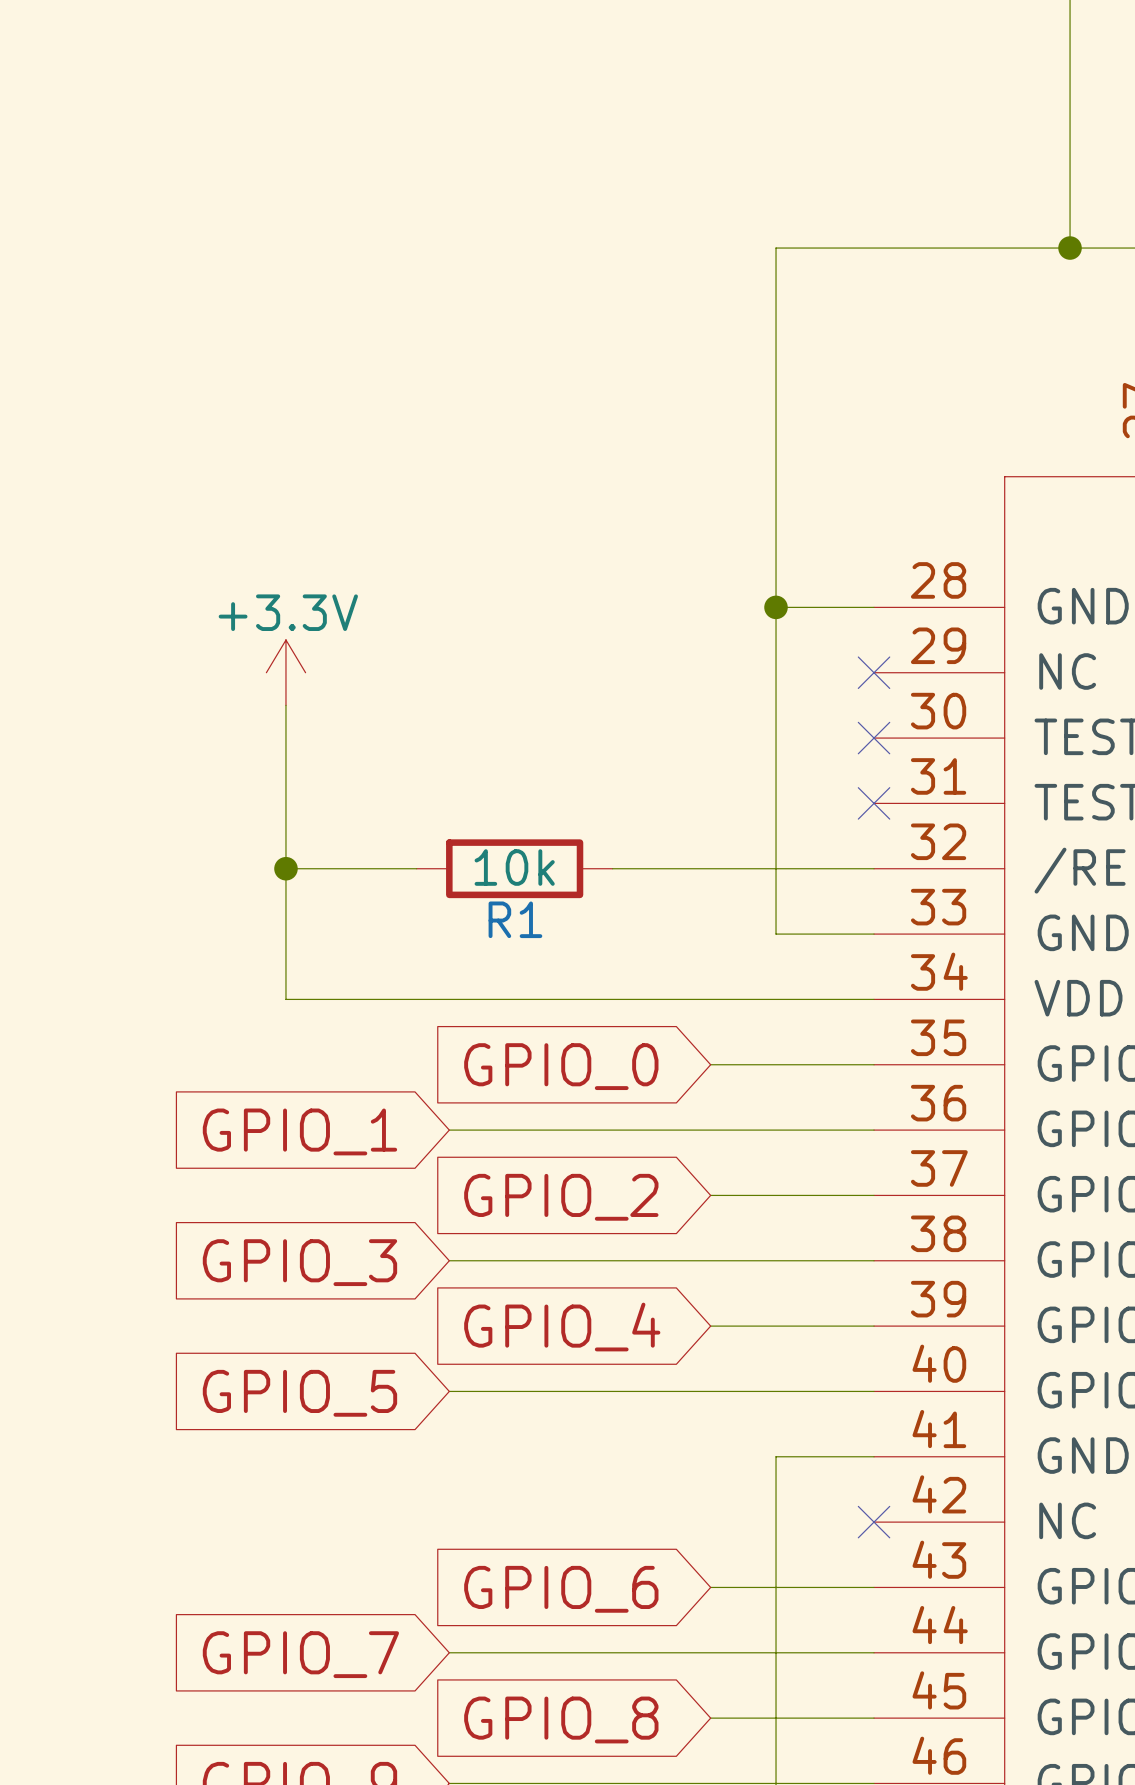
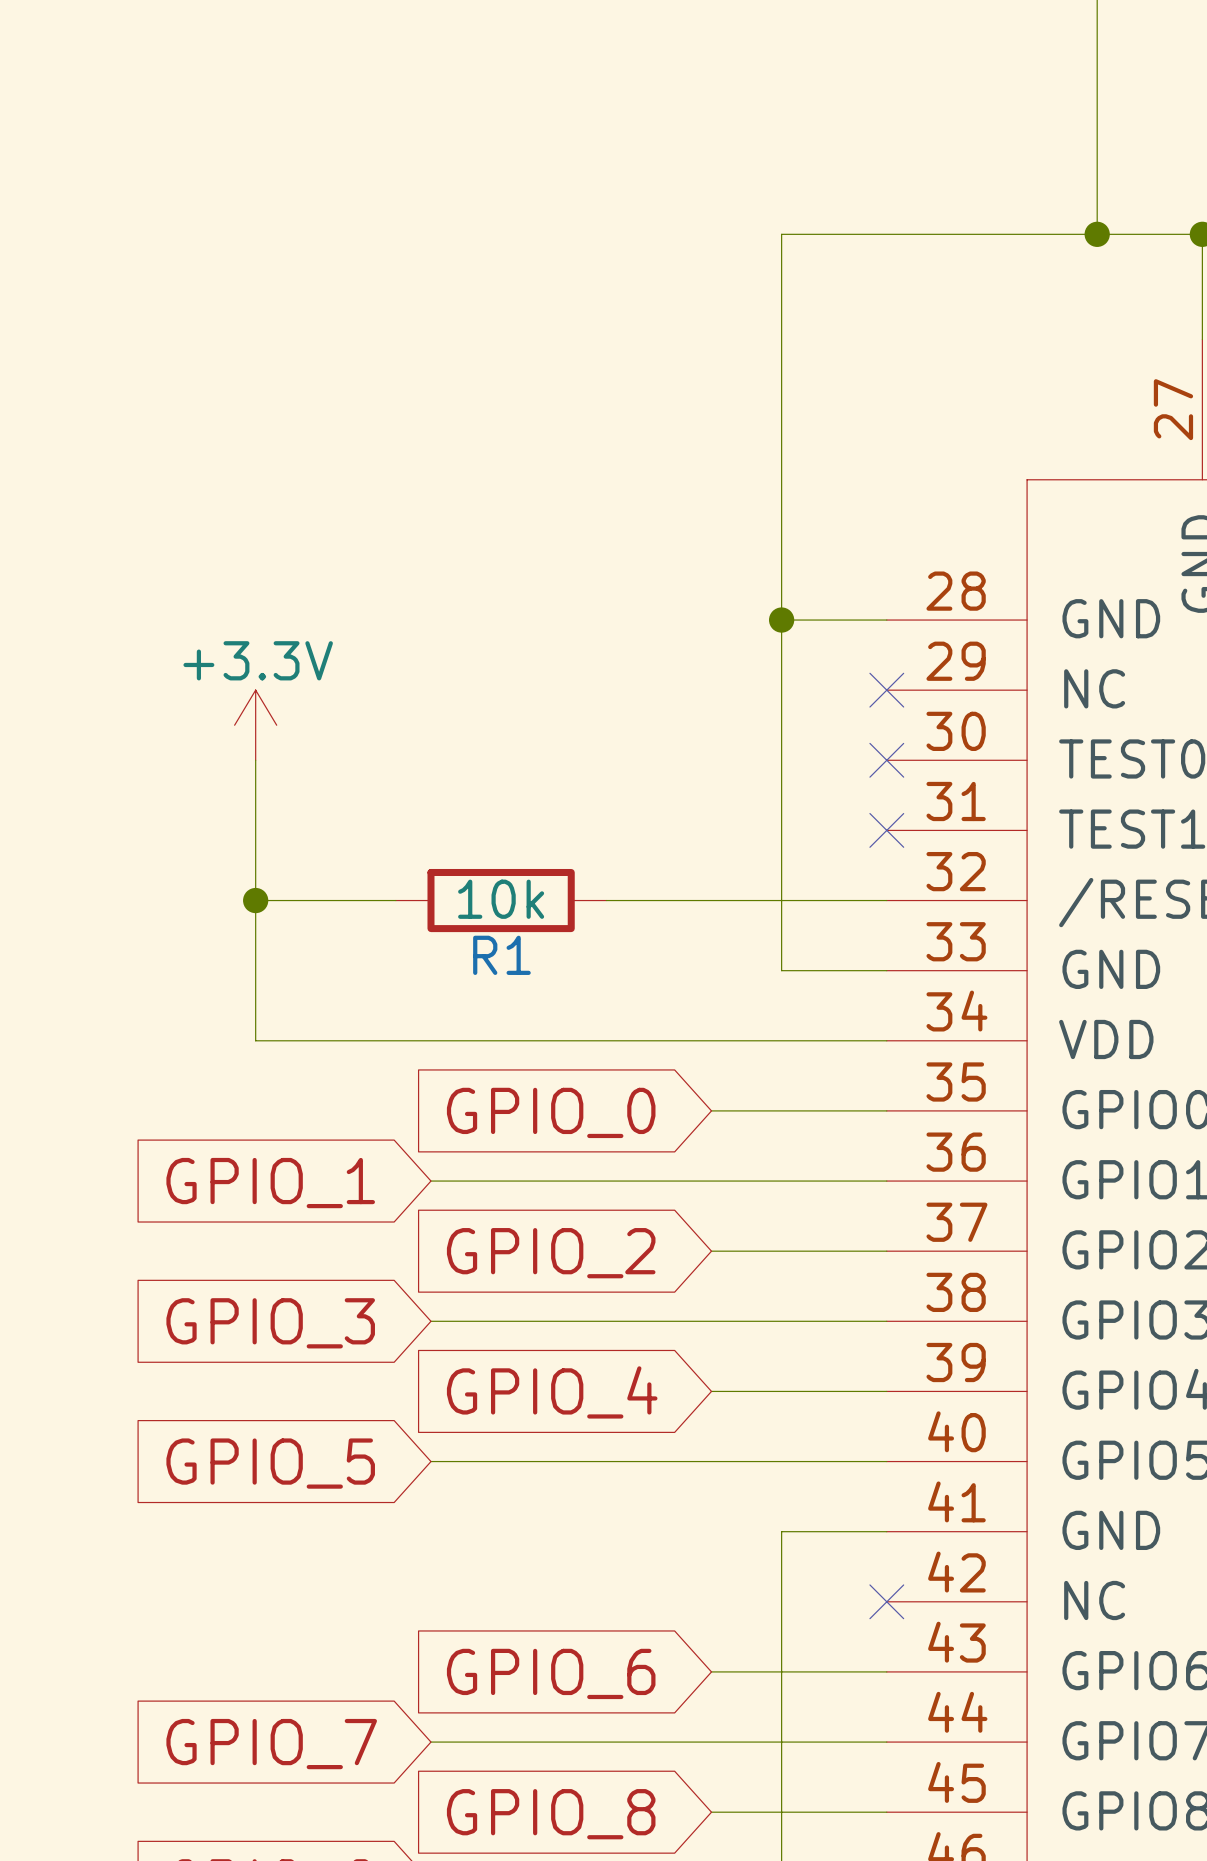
power symbol position: +3.3V (285, 672) -> +3.3V (255, 725)

